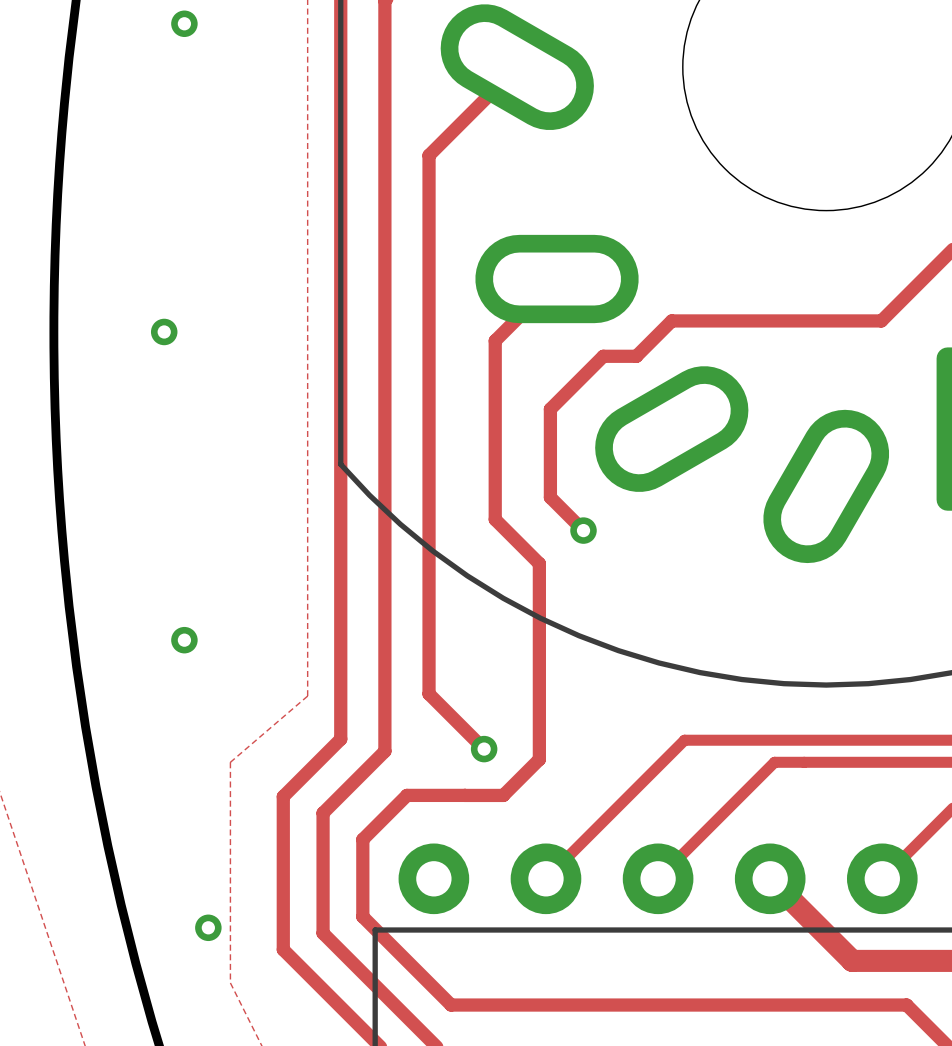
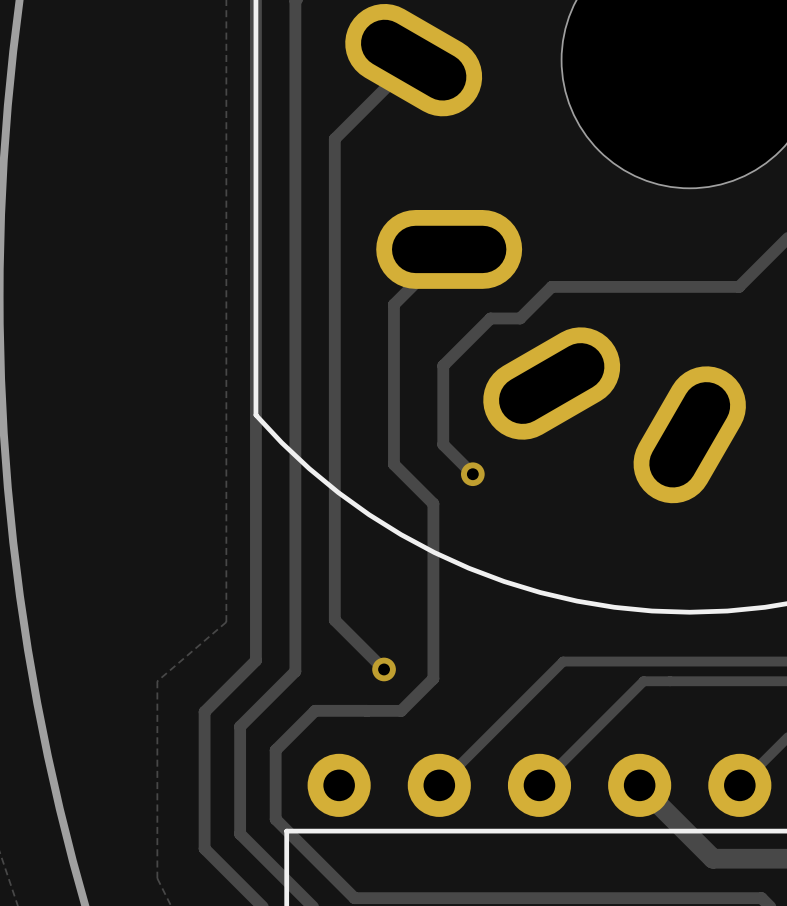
via: (184, 23) -> none
via: (164, 331) -> none
via: (184, 640) -> none
via: (208, 927) -> none

